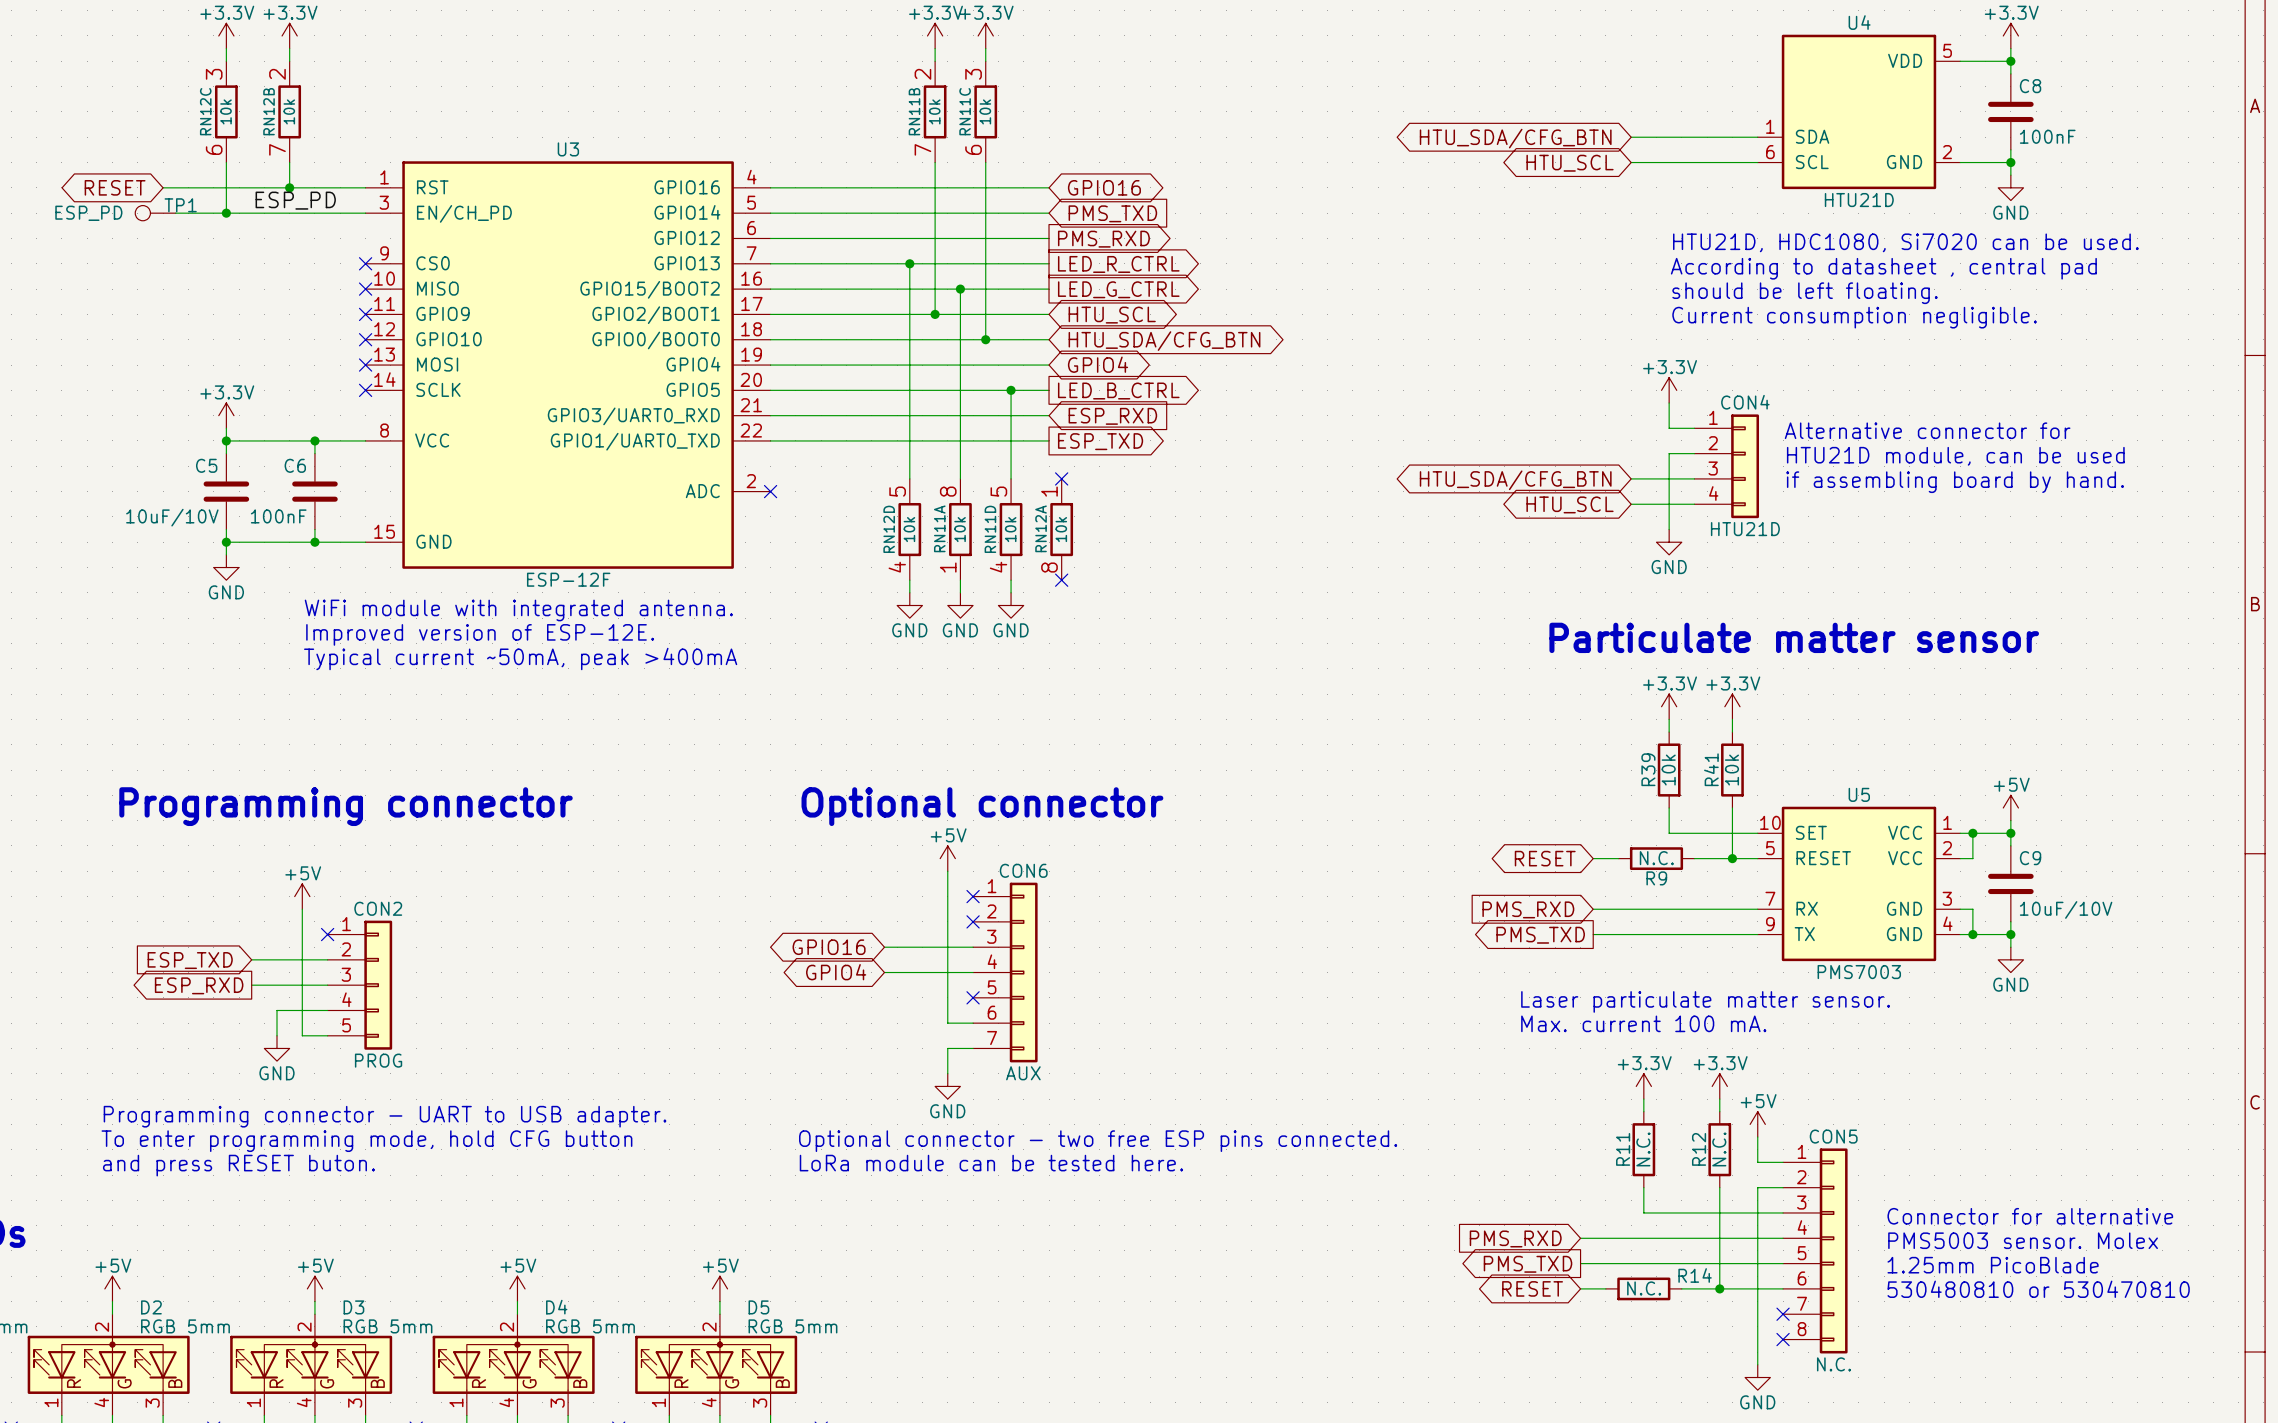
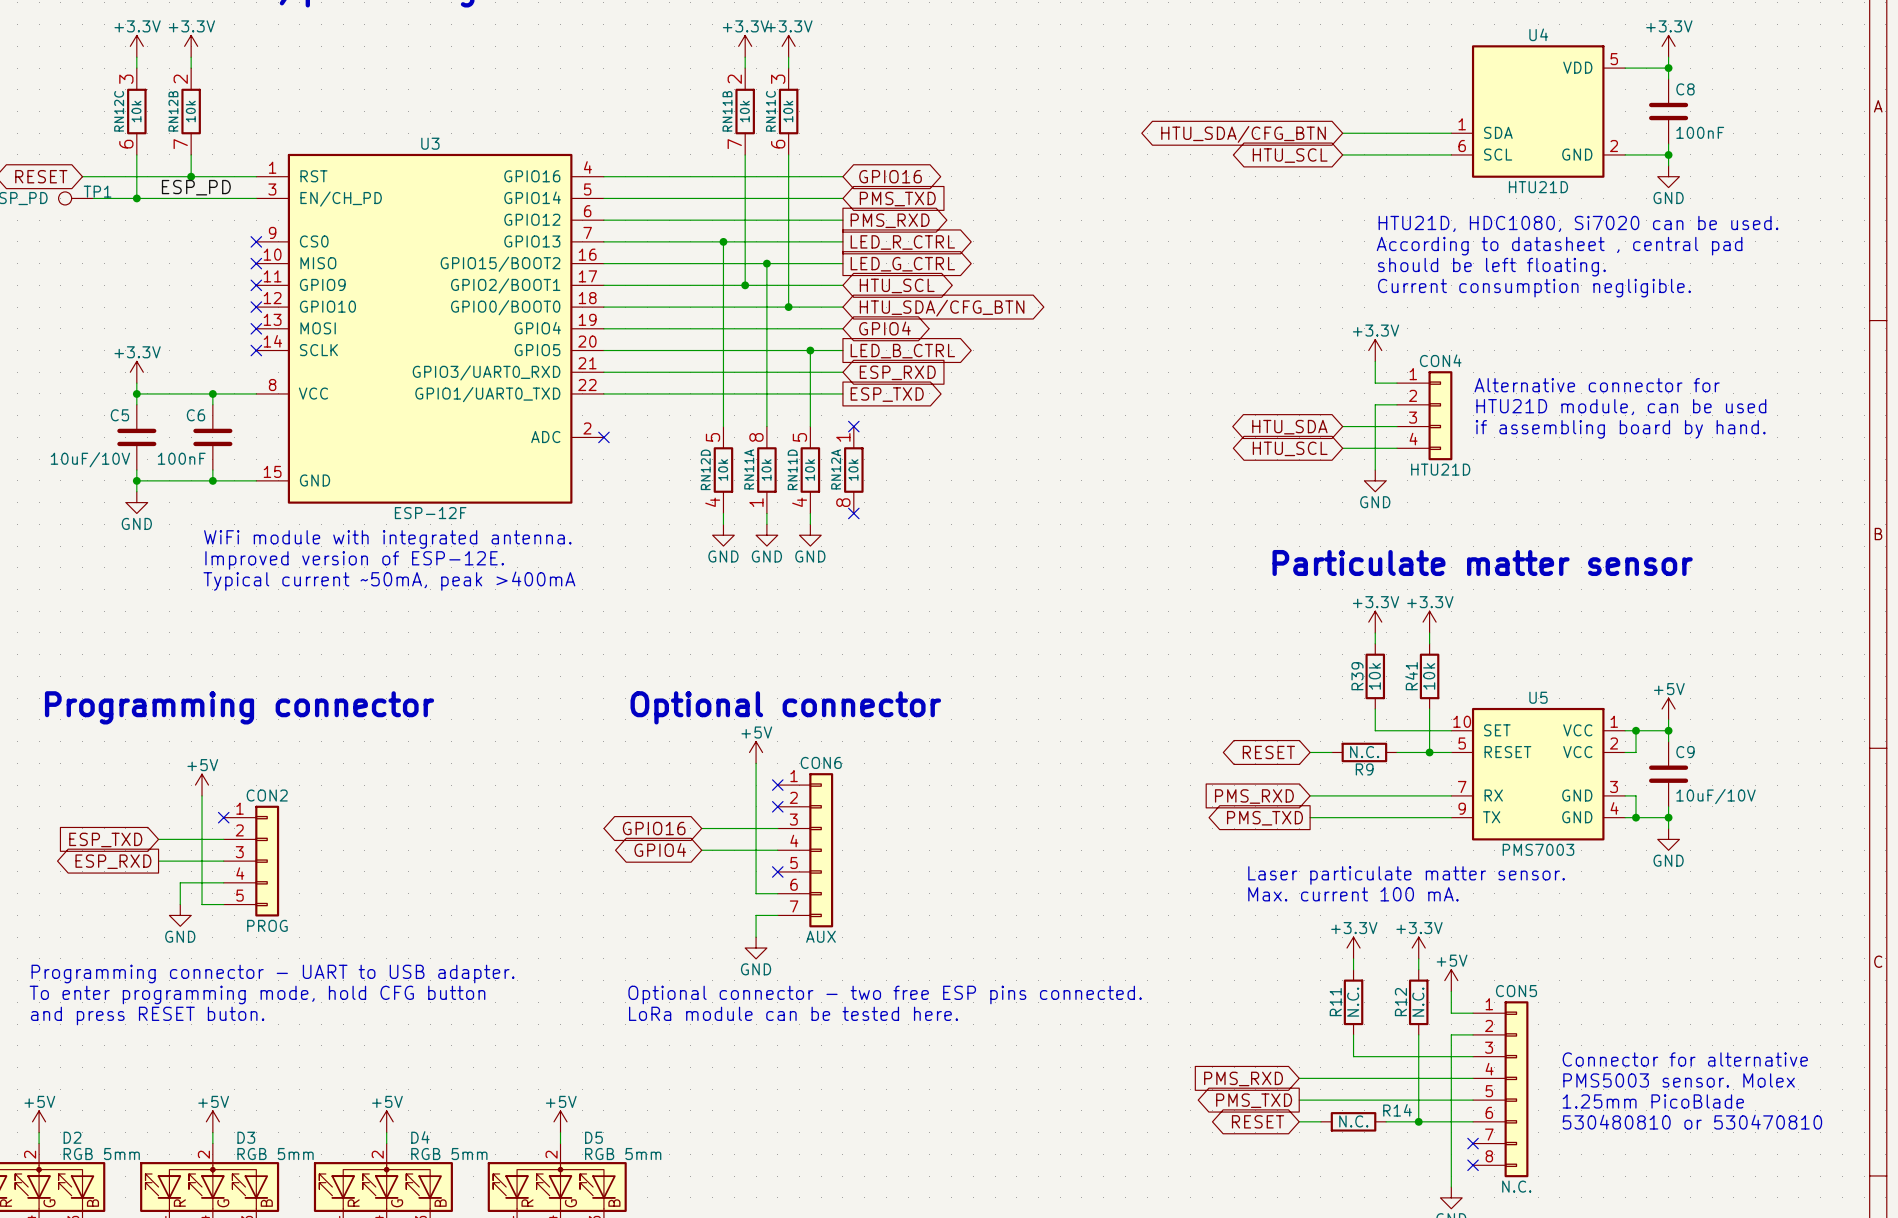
global label: HTU_SDA/CFG_BTN (1515, 480) -> HTU_SDA (1289, 427)

